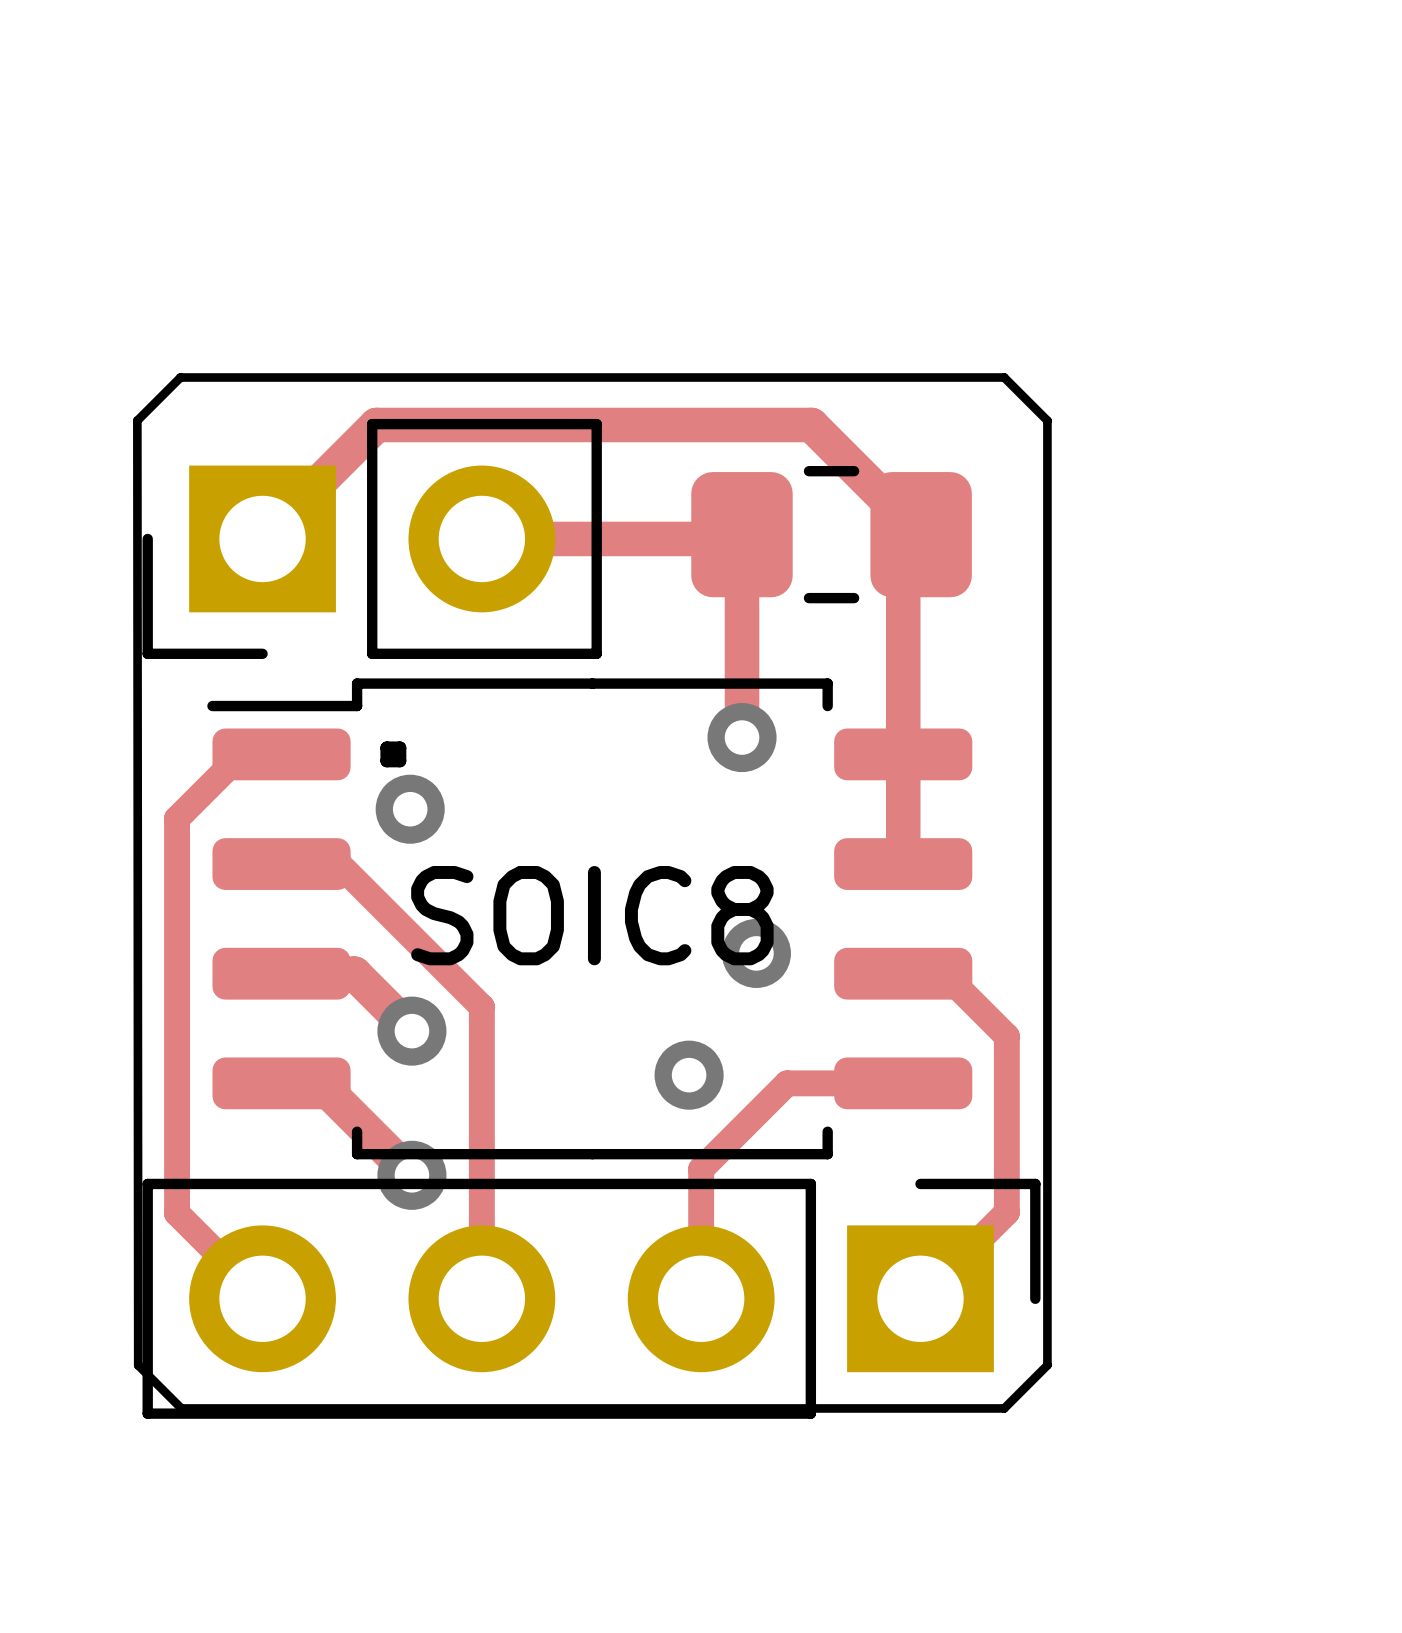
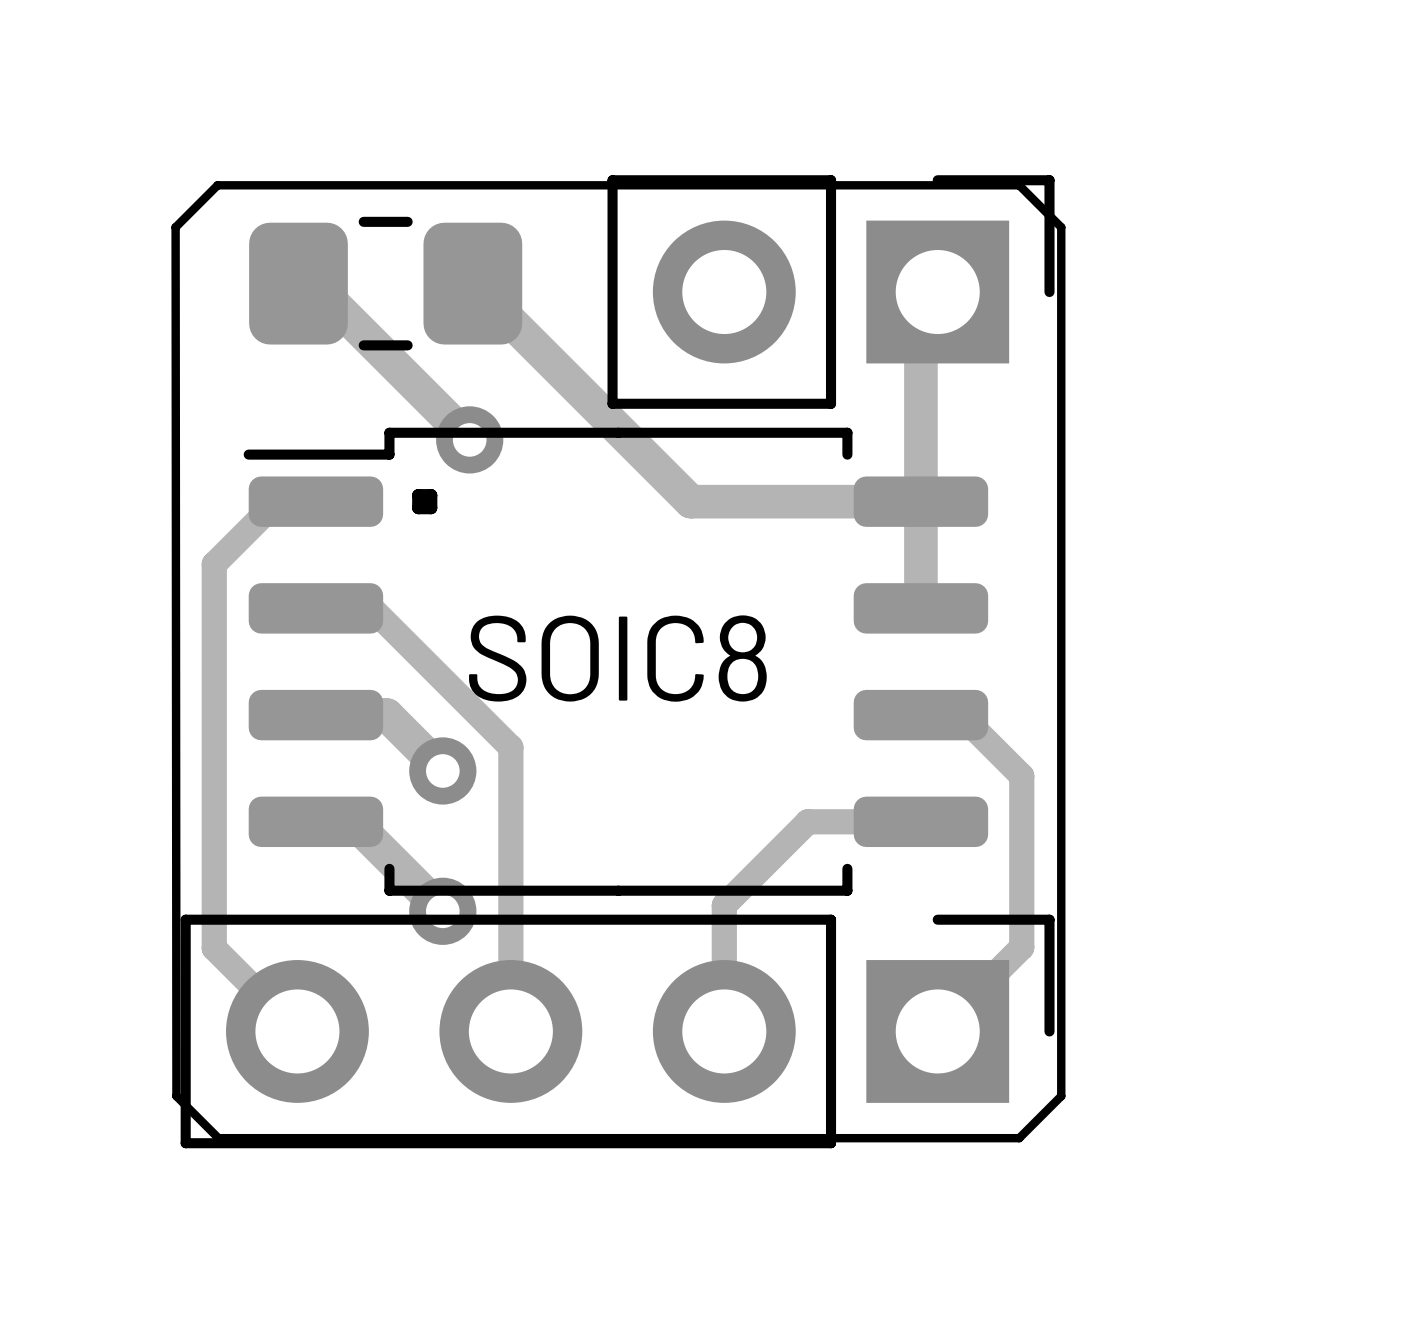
part footprint: [142, 418, 602, 659] -> [249, 216, 523, 351]
part footprint: [691, 466, 972, 604] -> [607, 175, 1055, 409]
board edge: (137, 472) (137, 420) (180, 377) (1004, 377) (1047, 420) (1047, 472) -> (175, 227) (217, 185) (1019, 185) (1061, 227)
track: none -> (298, 283) (313, 283) (469, 439)
track: none -> (472, 283) (690, 501) (920, 501)
track: (742, 534) (742, 737) -> none
track: (921, 534) (811, 424) (376, 424) (262, 538) -> none
track: (481, 538) (737, 538) -> none
via: (742, 737) -> none
via position: (410, 809) -> (469, 439)
via: (756, 953) -> none
via: (689, 1075) -> none

